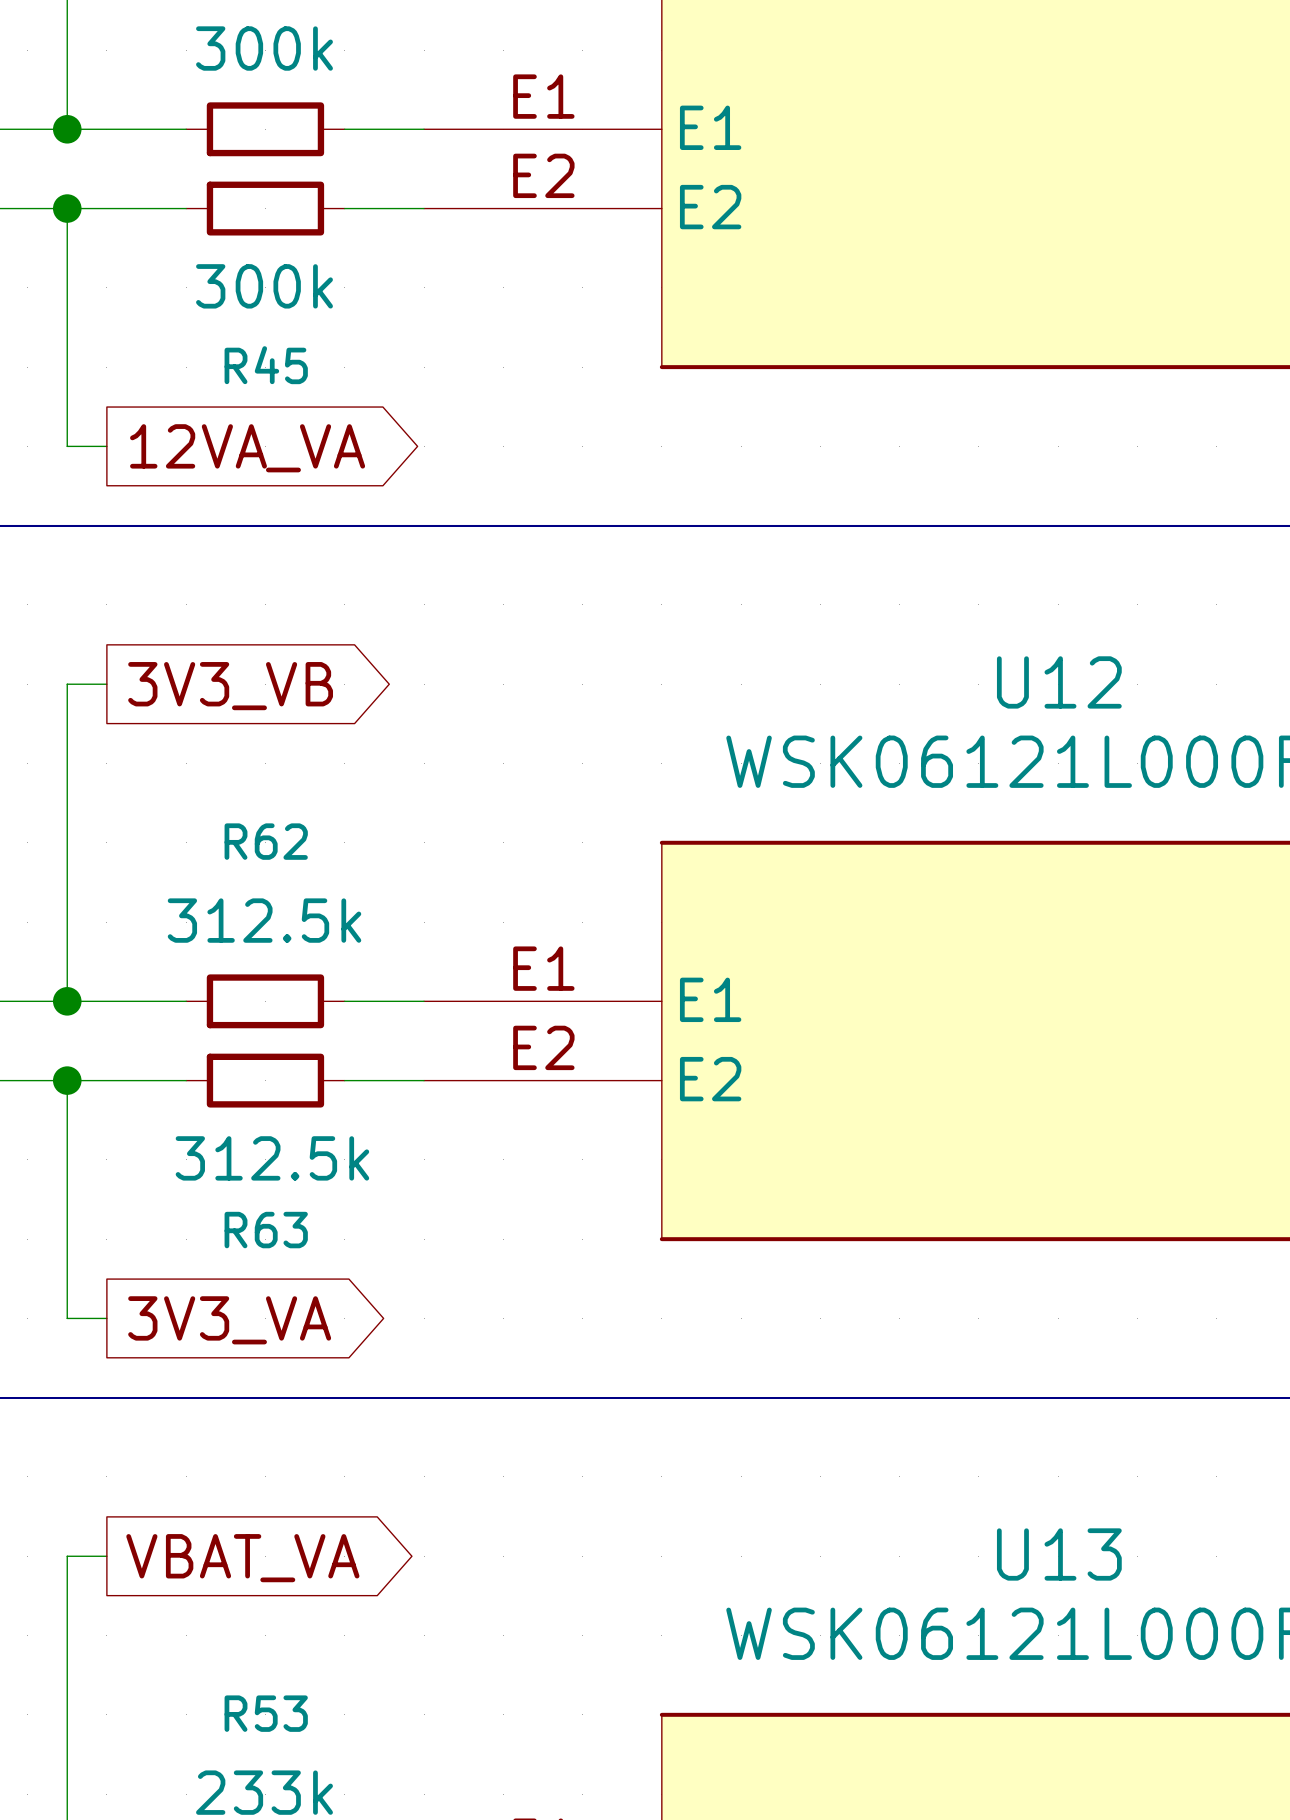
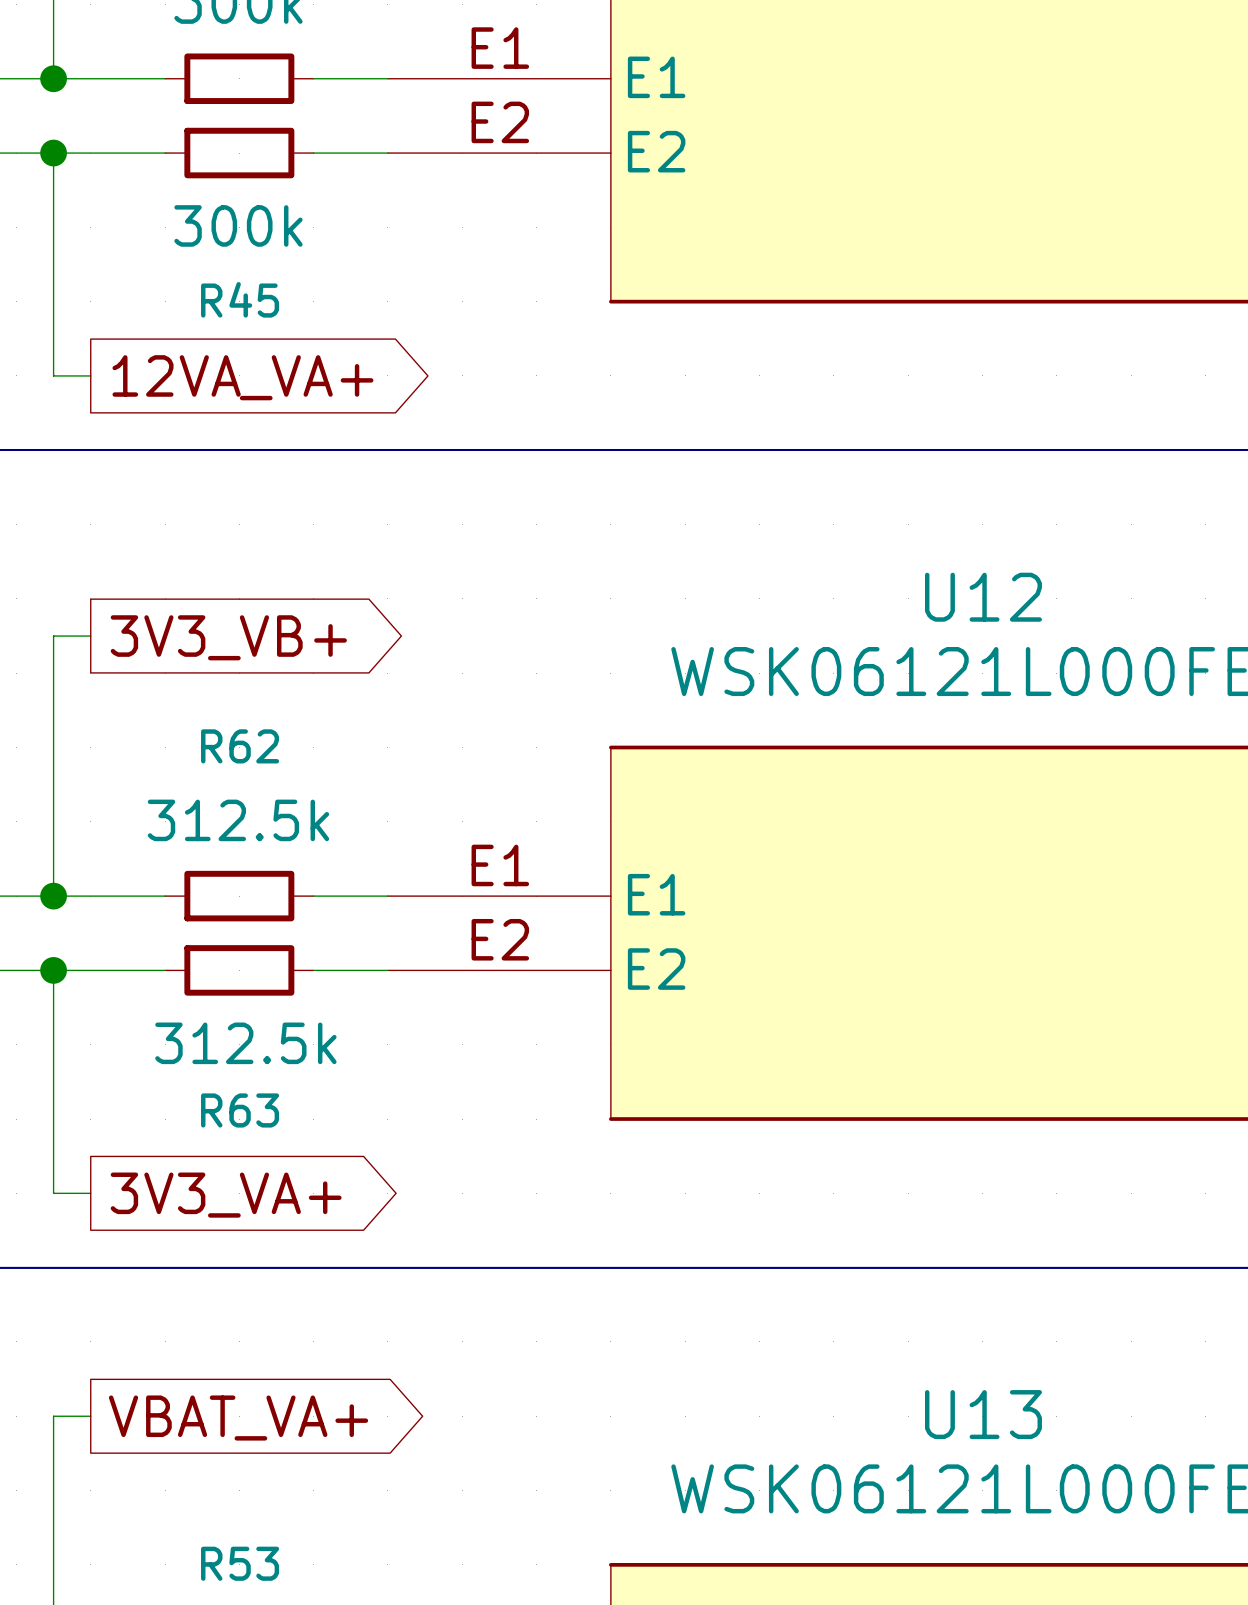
global label: 12VA_VA (247, 448) -> 12VA_VA+ (242, 377)
wire: (106, 684) (67, 684) (67, 723) -> (90, 636) (53, 636)
global label: 3V3_VB (230, 686) -> 3V3_VB+ (228, 637)
global label: 3V3_VA (229, 1320) -> 3V3_VA+ (226, 1195)
global label: VBAT_VA (242, 1558) -> VBAT_VA+ (238, 1418)

